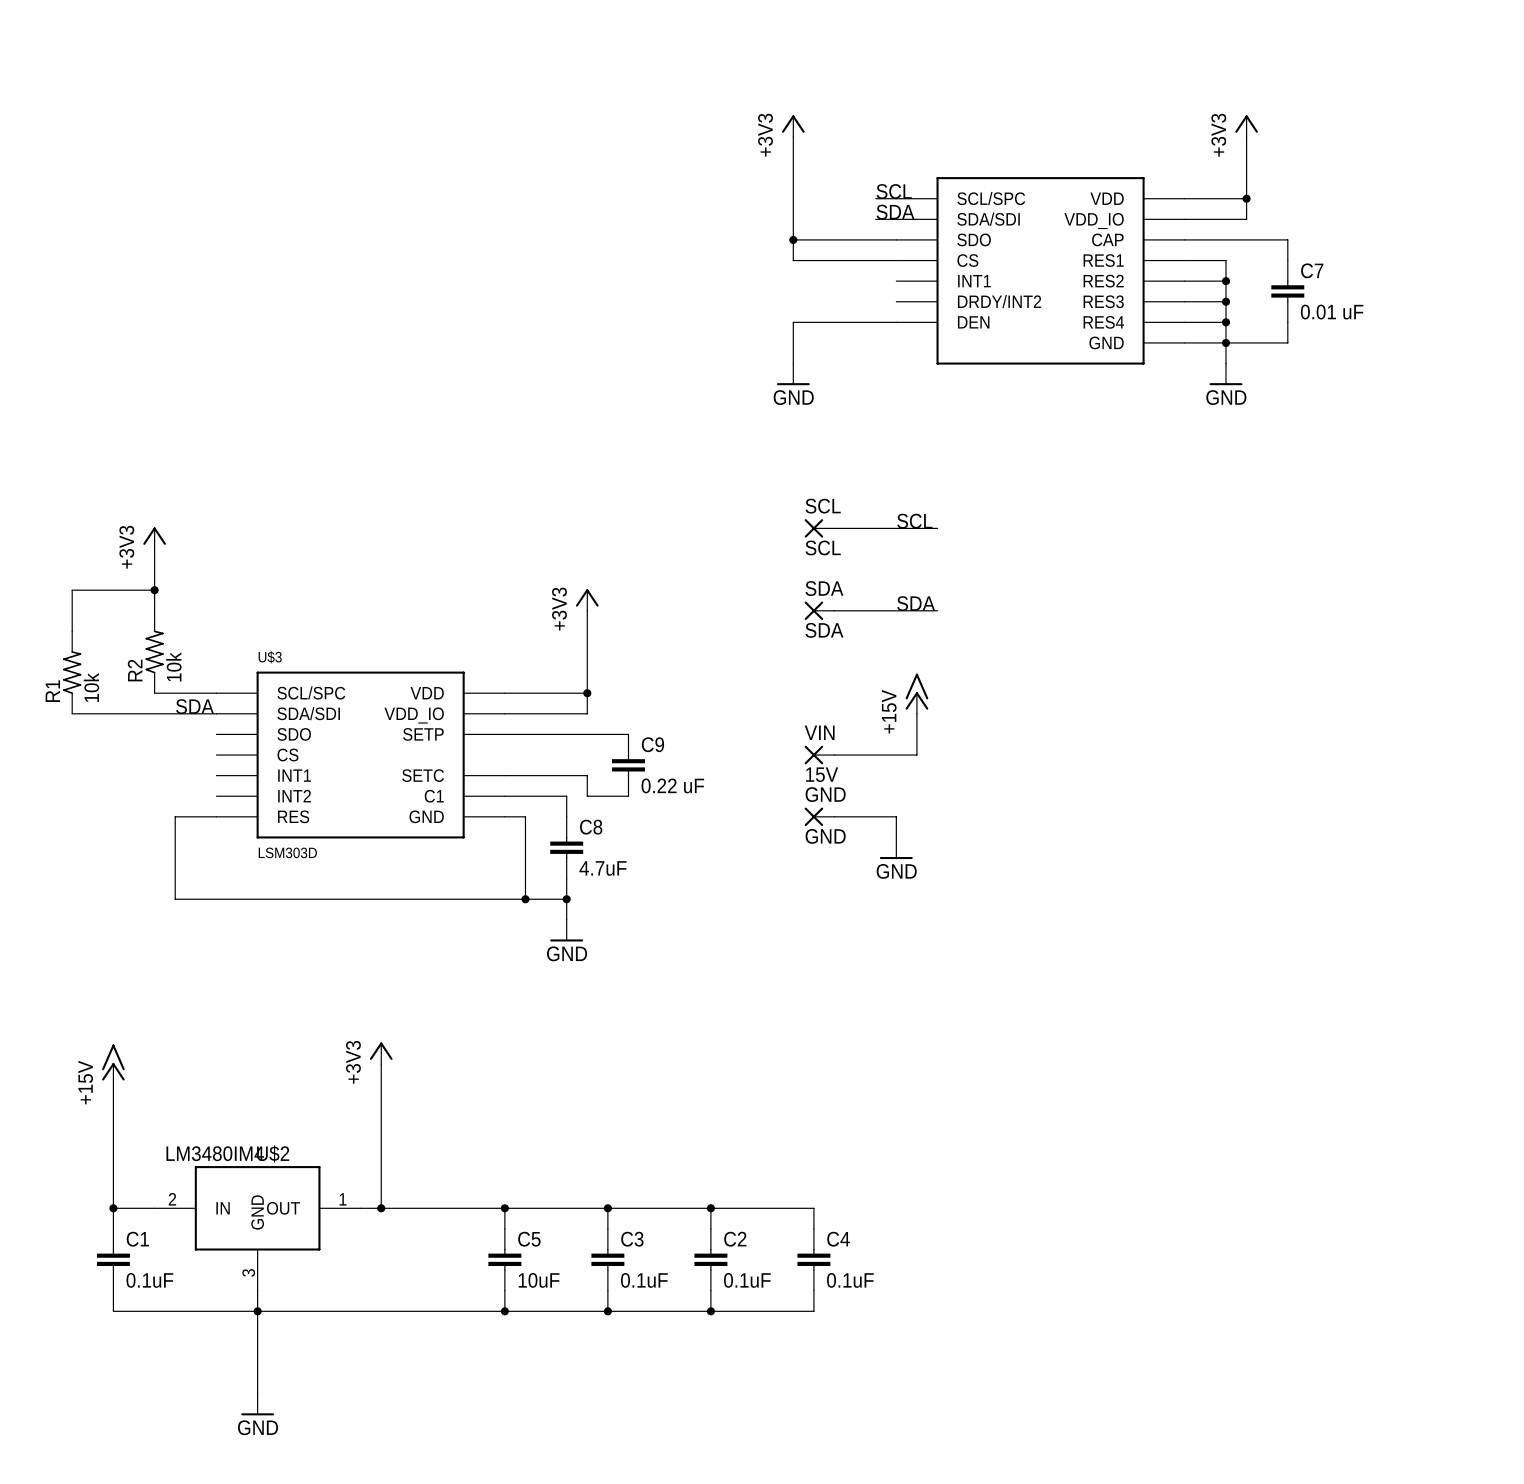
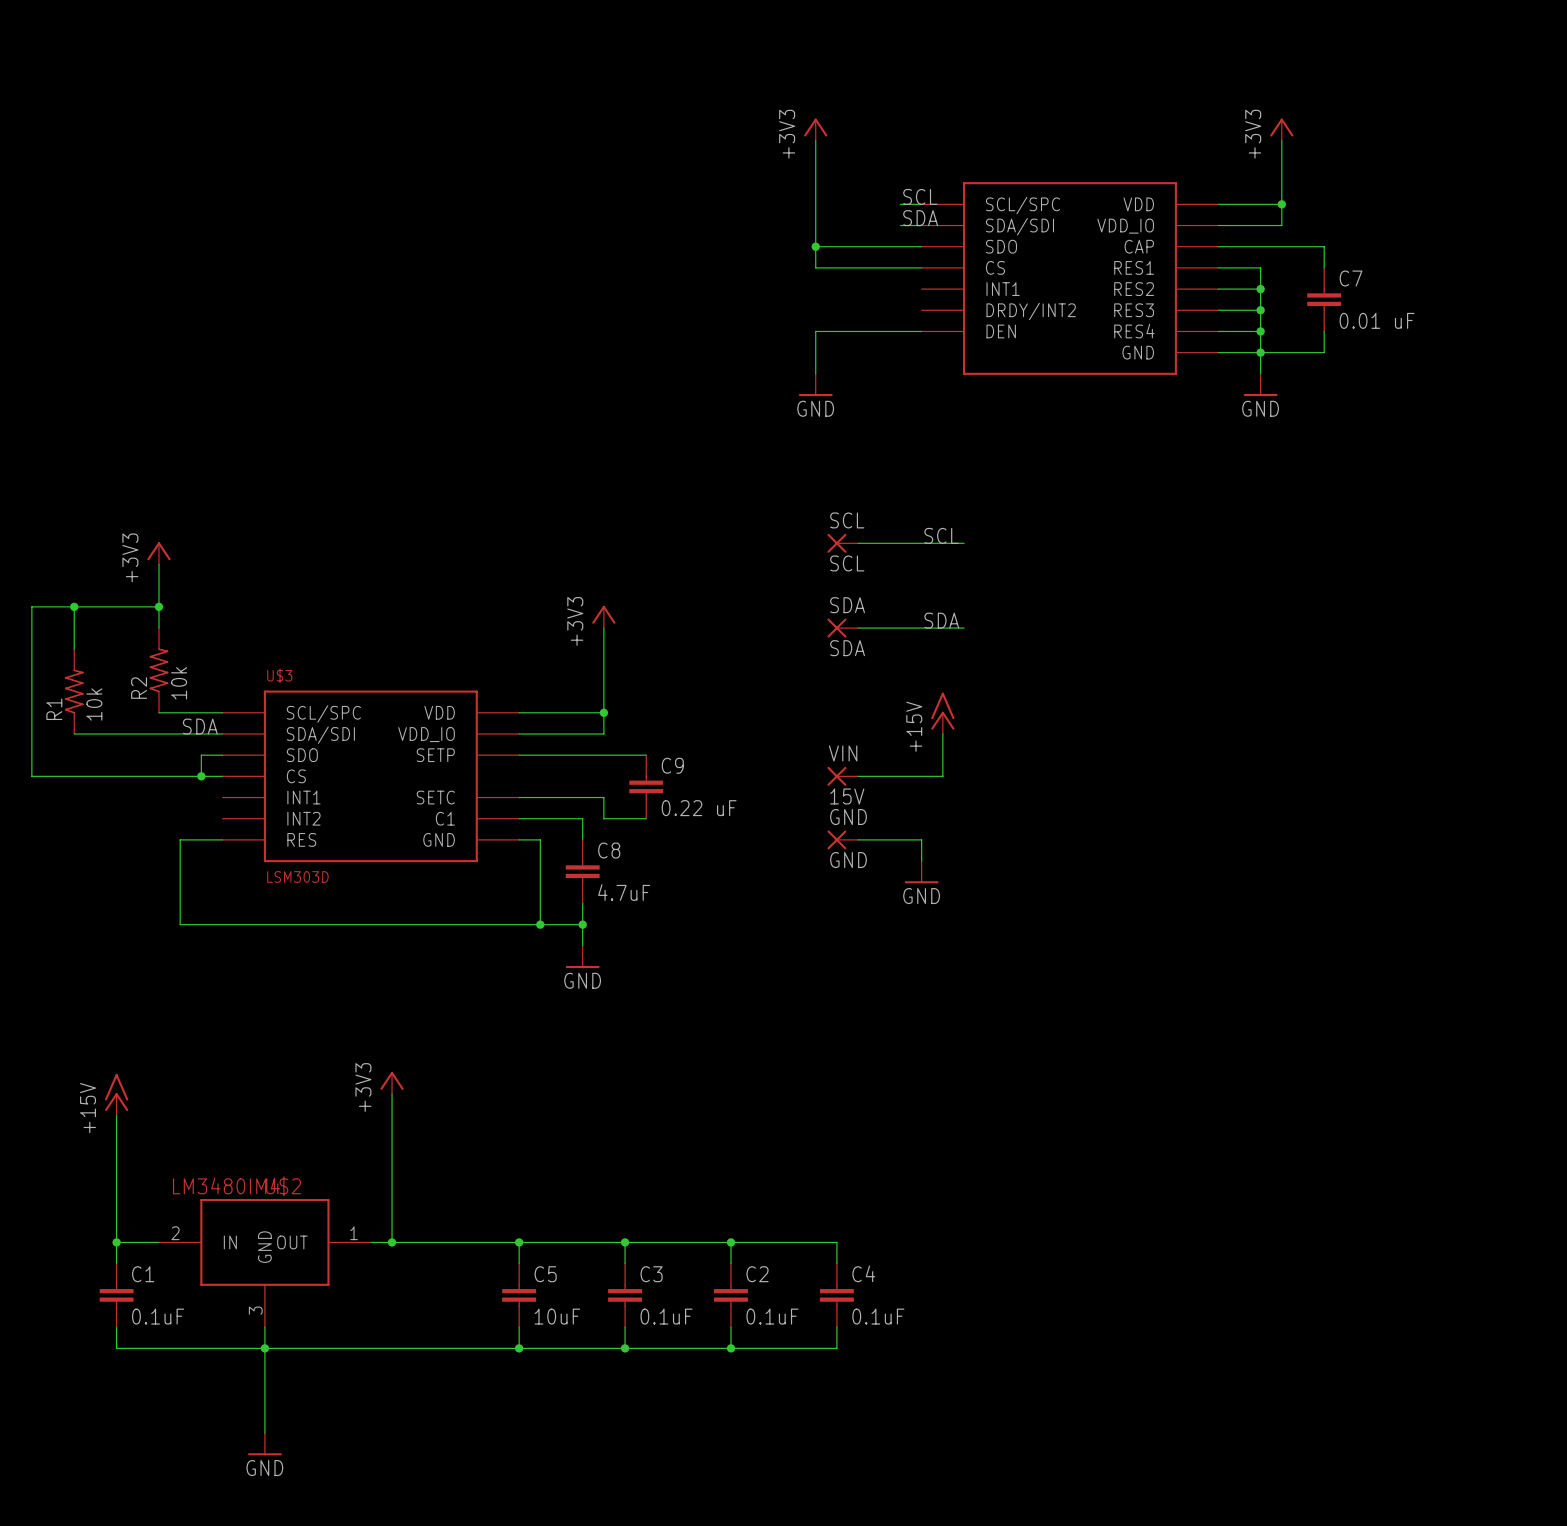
wire: none -> (74, 606) (31, 606) (31, 776) (222, 776)
junction: none -> (74, 606)
wire: none -> (222, 755) (201, 755) (201, 776)
junction: none -> (201, 776)

